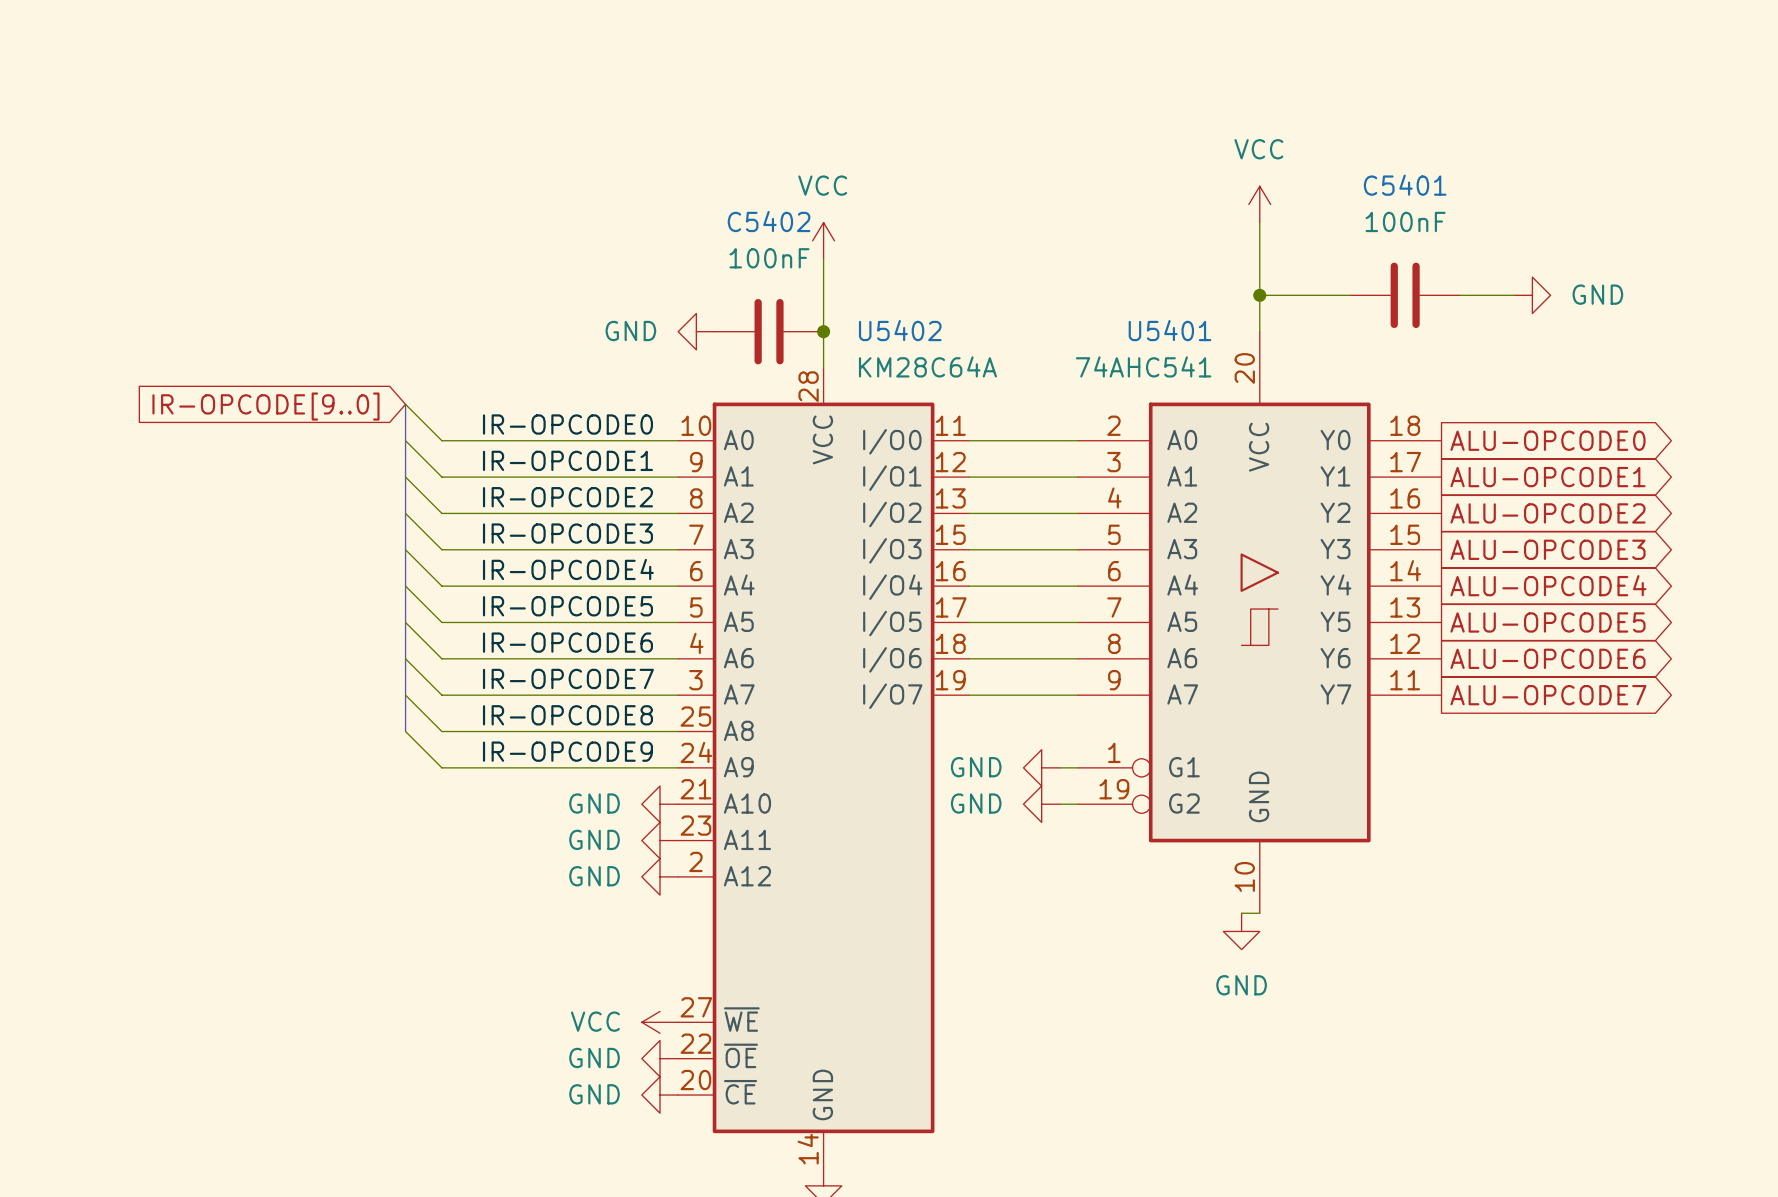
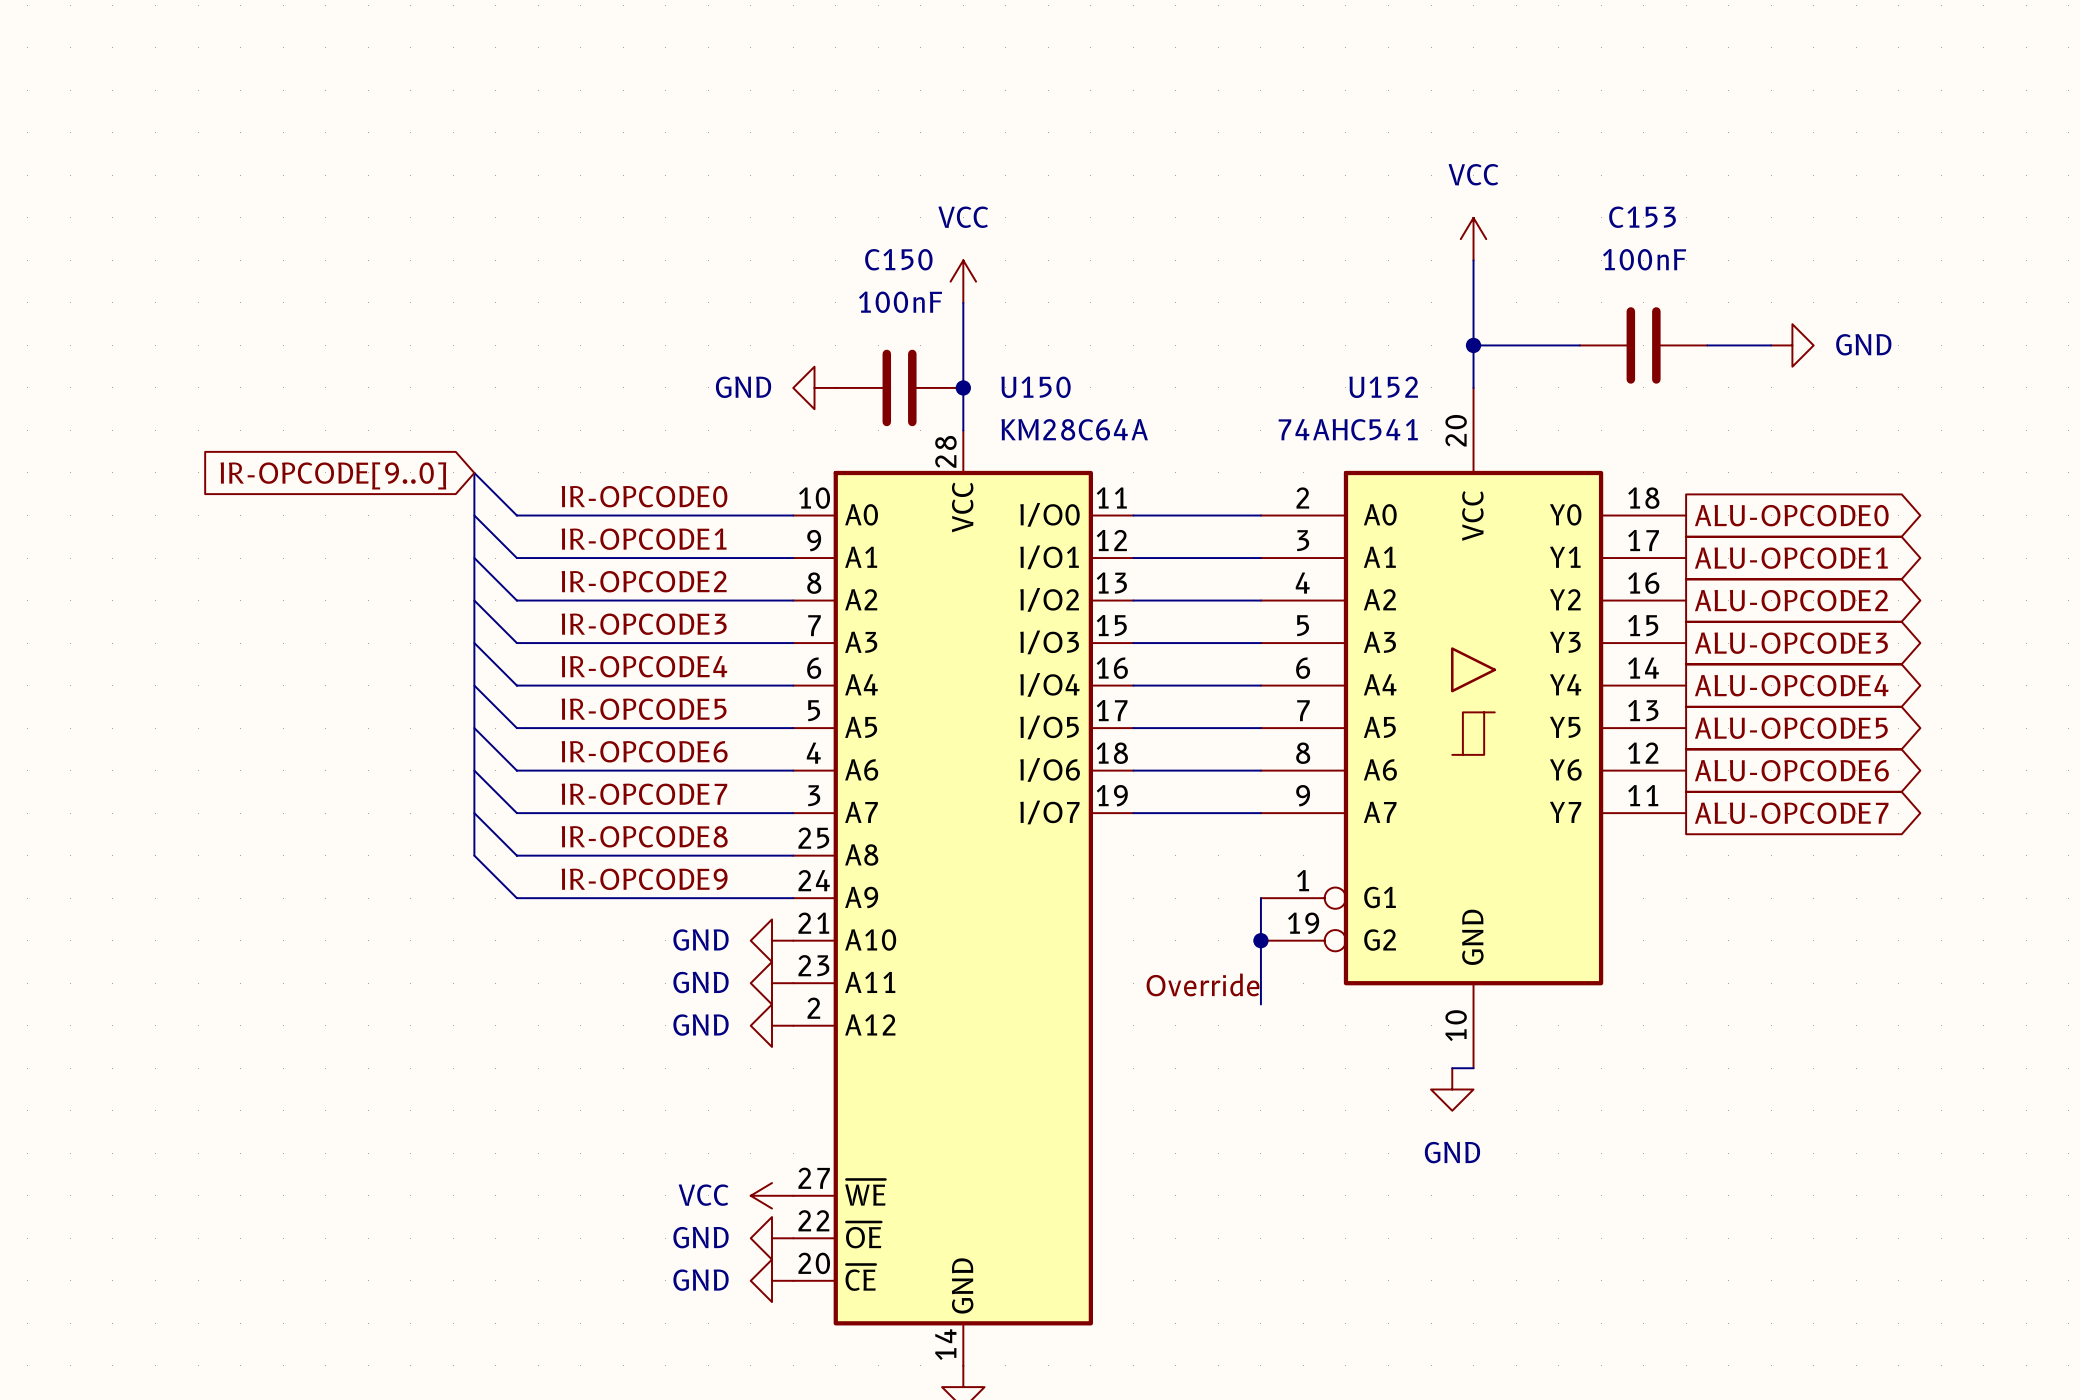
C5401 name: C5401 (1405, 185) -> C153 (1642, 217)
C5402 name: C5402 (769, 221) -> C150 (898, 259)
U5402 name: U5402 (900, 330) -> U150 (1035, 387)
U5401 name: U5401 (1170, 330) -> U152 (1383, 387)
power symbol: GND (1041, 767) -> none
wire: (1059, 767) (1078, 767) -> (1260, 1004) (1260, 898)
power symbol: GND (1041, 804) -> none
wire: (1059, 804) (1078, 804) -> none
junction: none -> (1260, 940)
label: none -> Override (1202, 984)

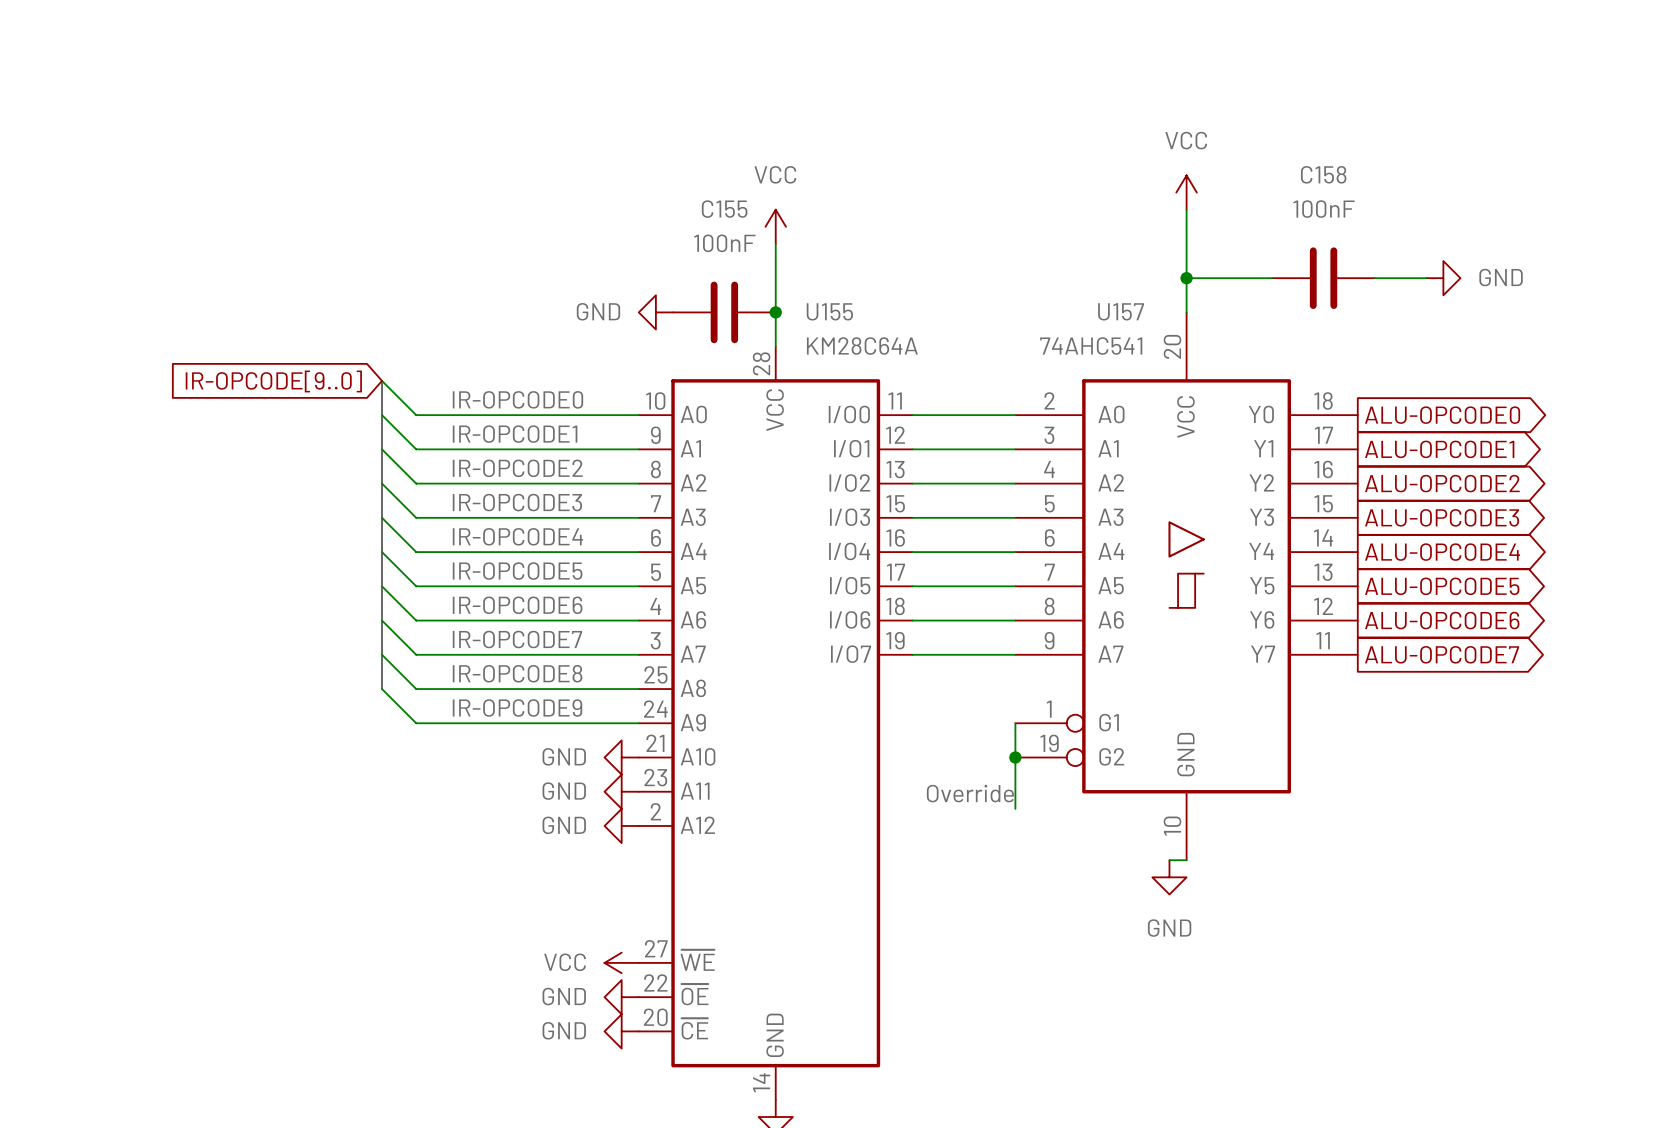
C153 name: C153 (1642, 217) -> C158 (1323, 174)
C150 name: C150 (898, 259) -> C155 (724, 209)
U150 name: U150 (1035, 387) -> U155 (829, 311)
U152 name: U152 (1383, 387) -> U157 (1121, 311)

